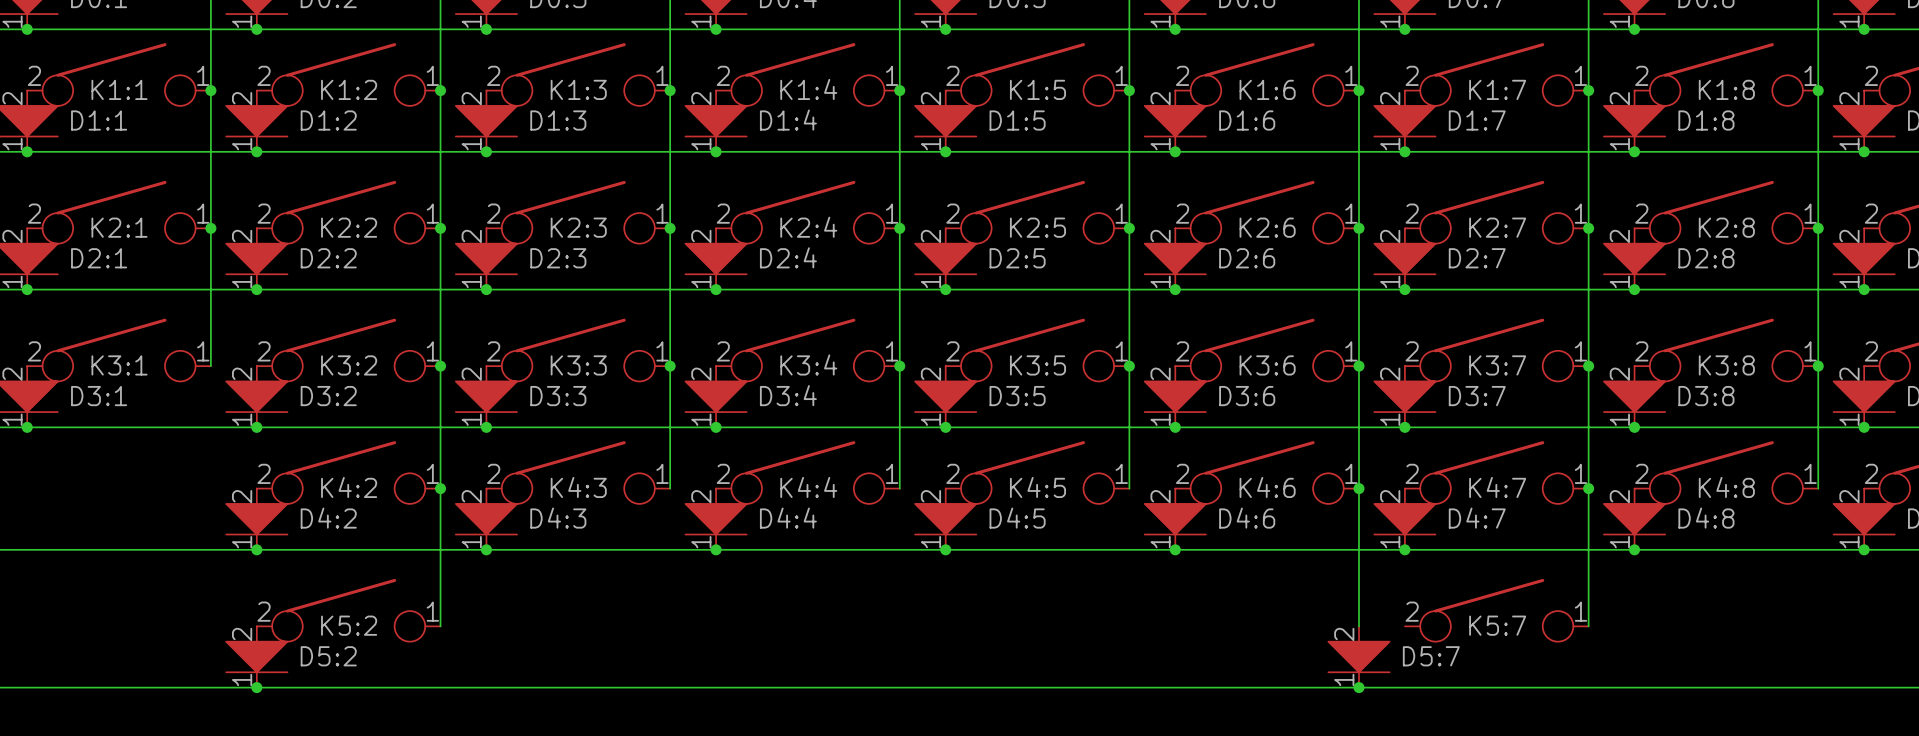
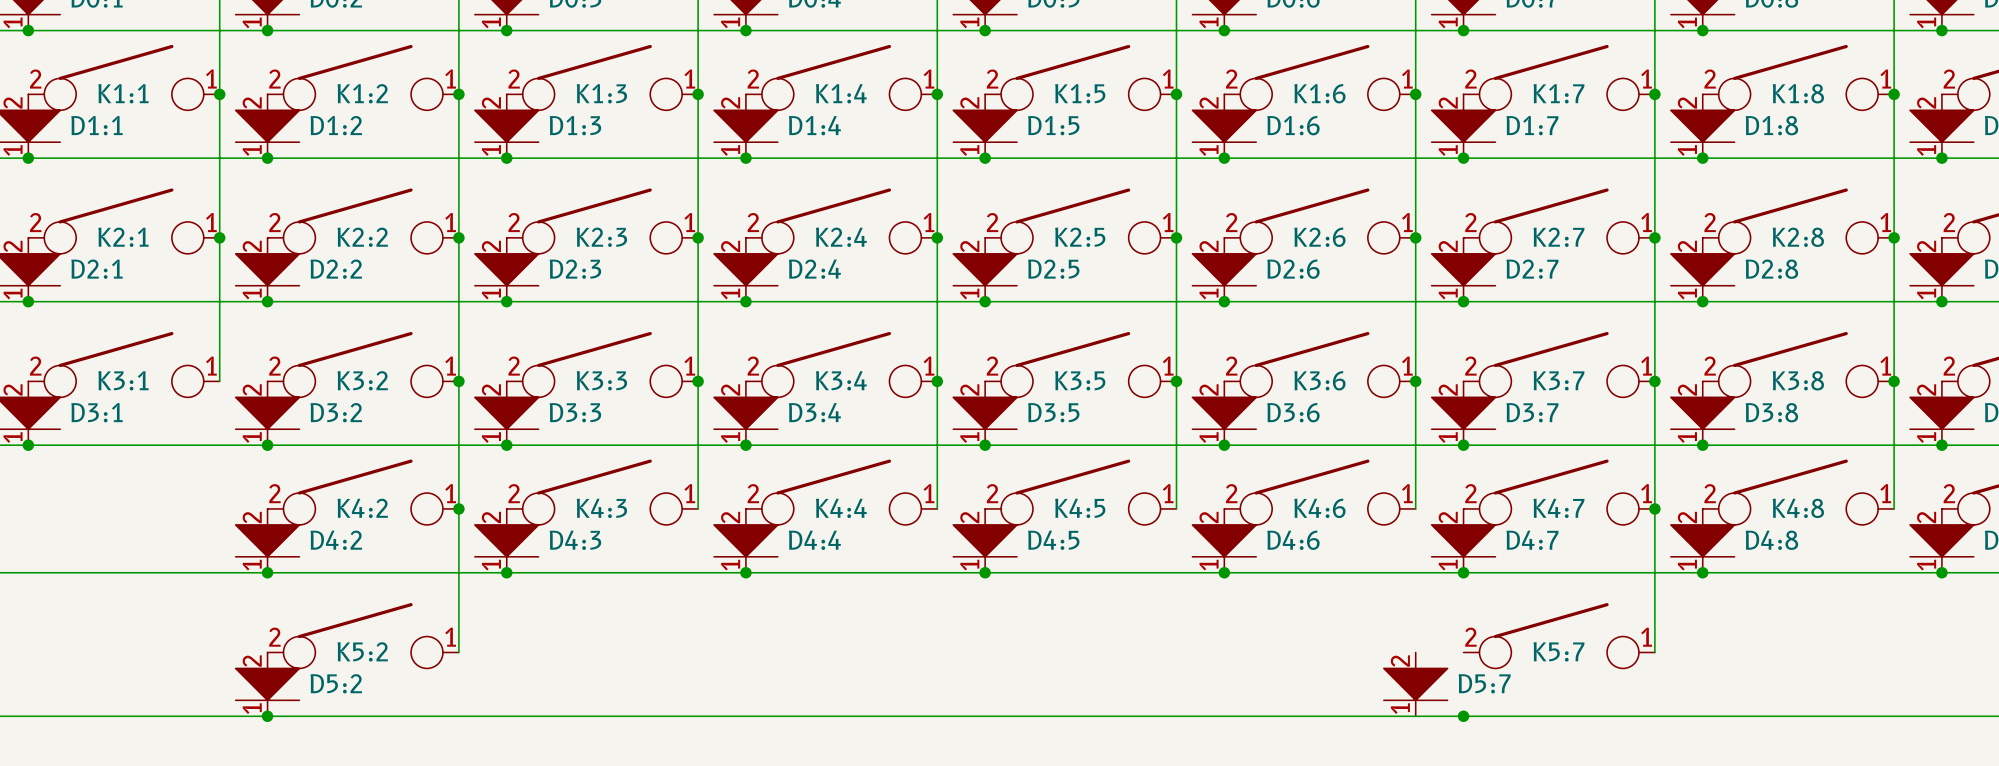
wire: (1359, 488) (1359, 626) -> none
junction: (1359, 488) -> none
junction position: (1359, 687) -> (1463, 716)

